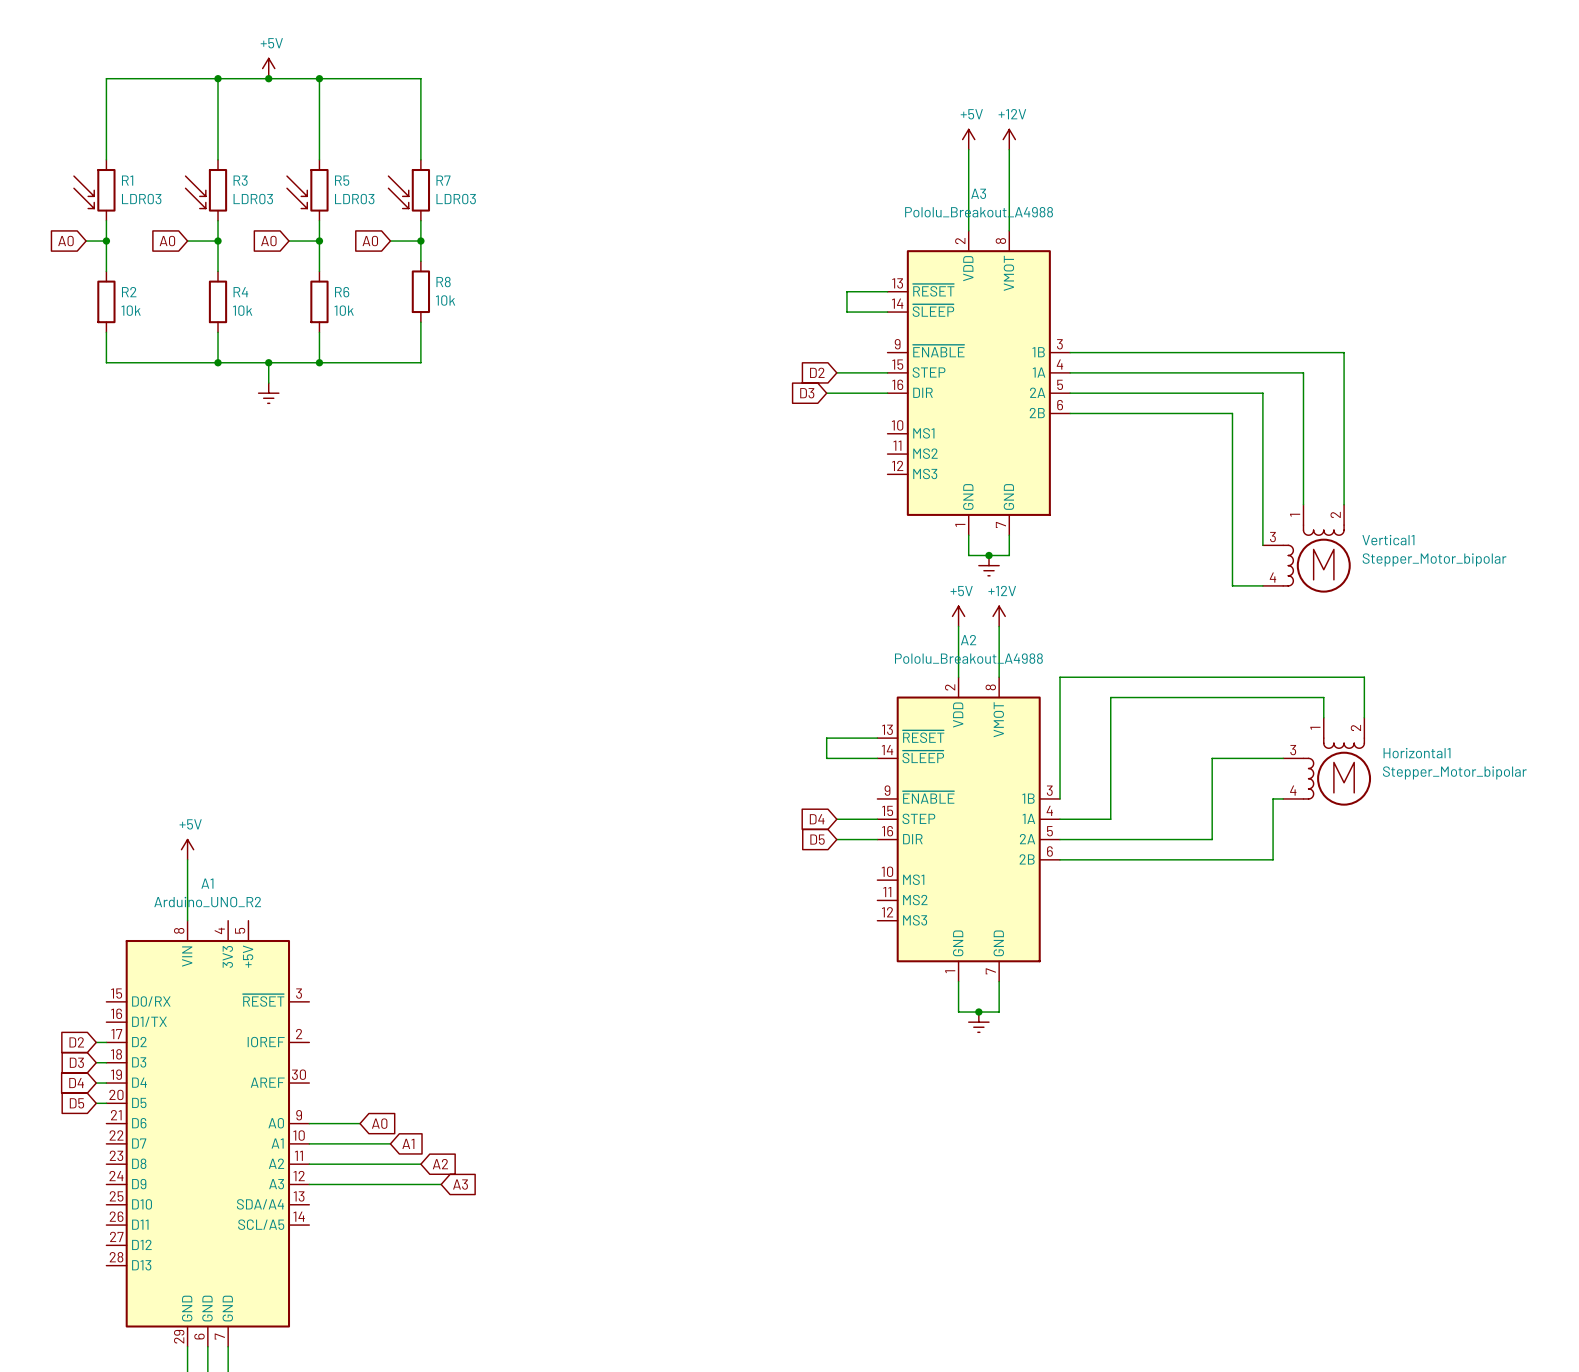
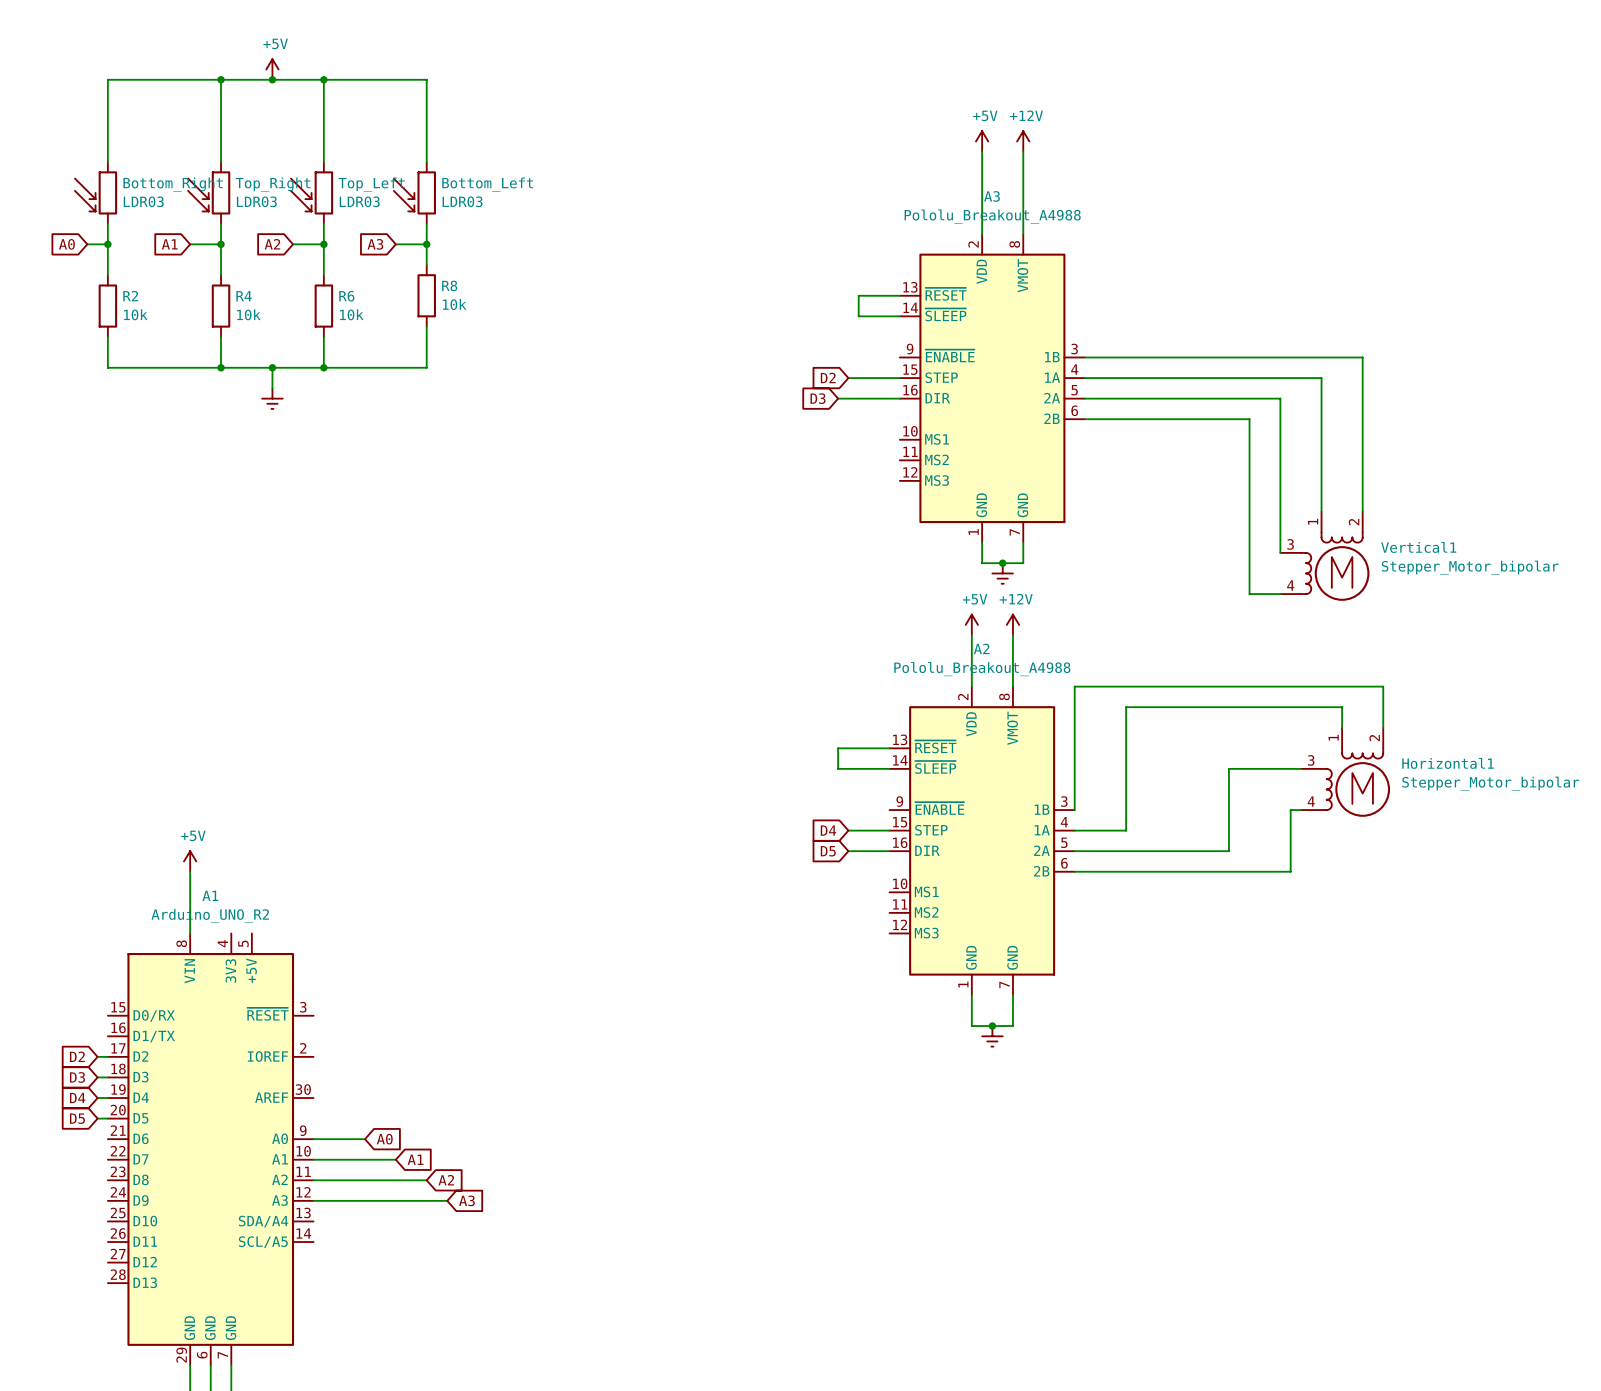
R1 name: R1 (127, 180) -> Bottom_Right (173, 184)
R3 name: R3 (240, 180) -> Top_Right (273, 184)
R5 name: R5 (342, 180) -> Top_Left (371, 184)
R7 name: R7 (443, 180) -> Bottom_Left (487, 184)
global label: A0 (167, 241) -> A1 (169, 244)
global label: A0 (268, 241) -> A2 (272, 244)
global label: A0 (370, 241) -> A3 (375, 244)

